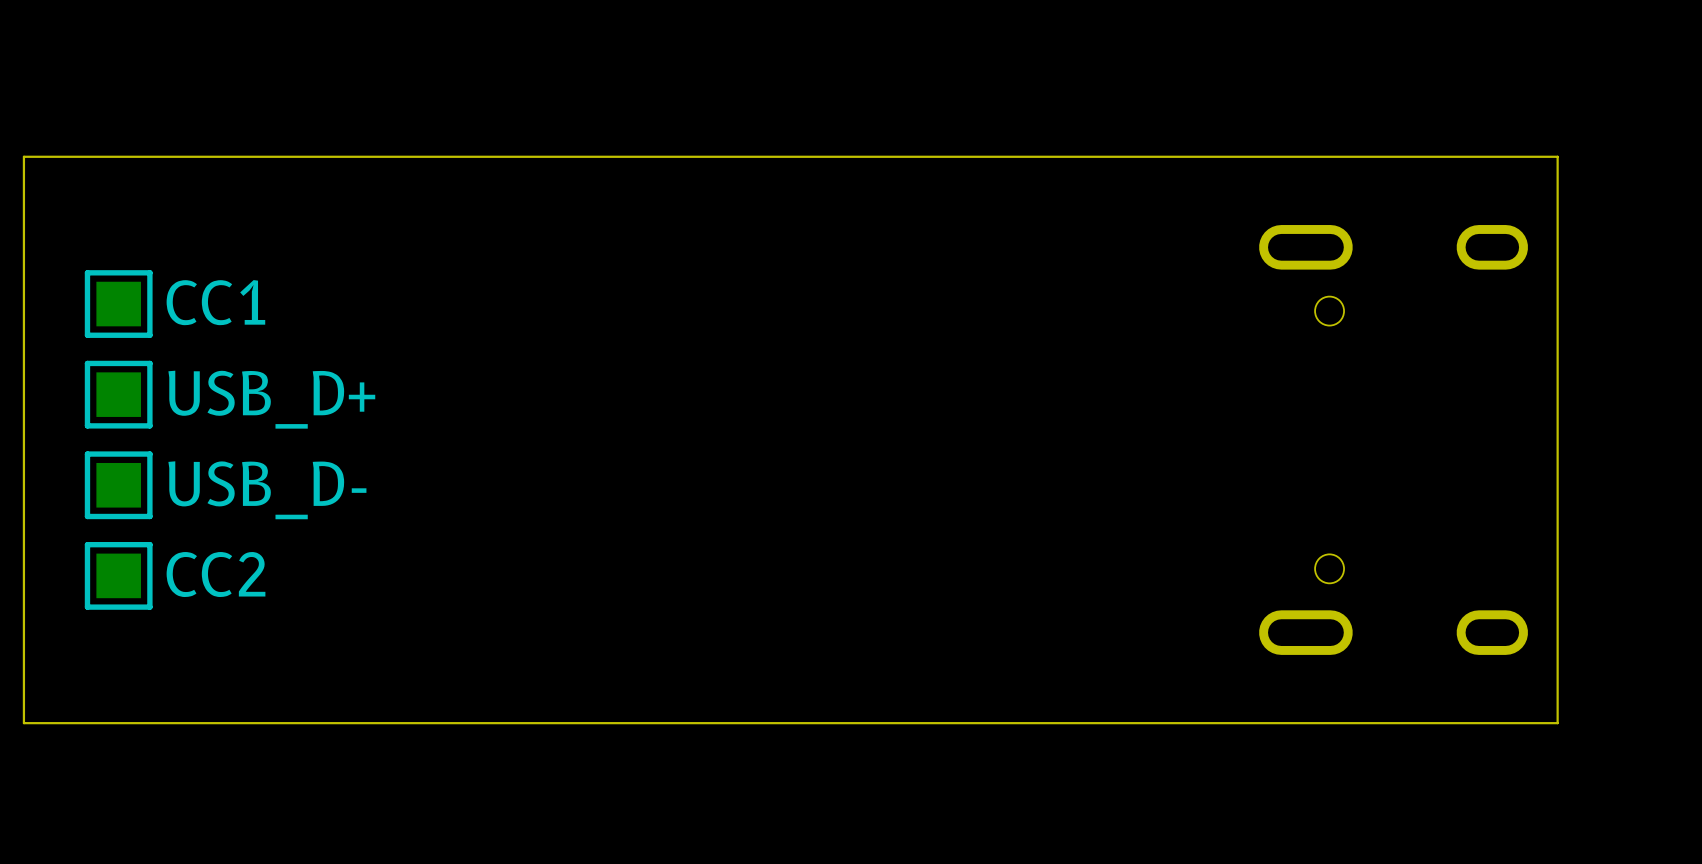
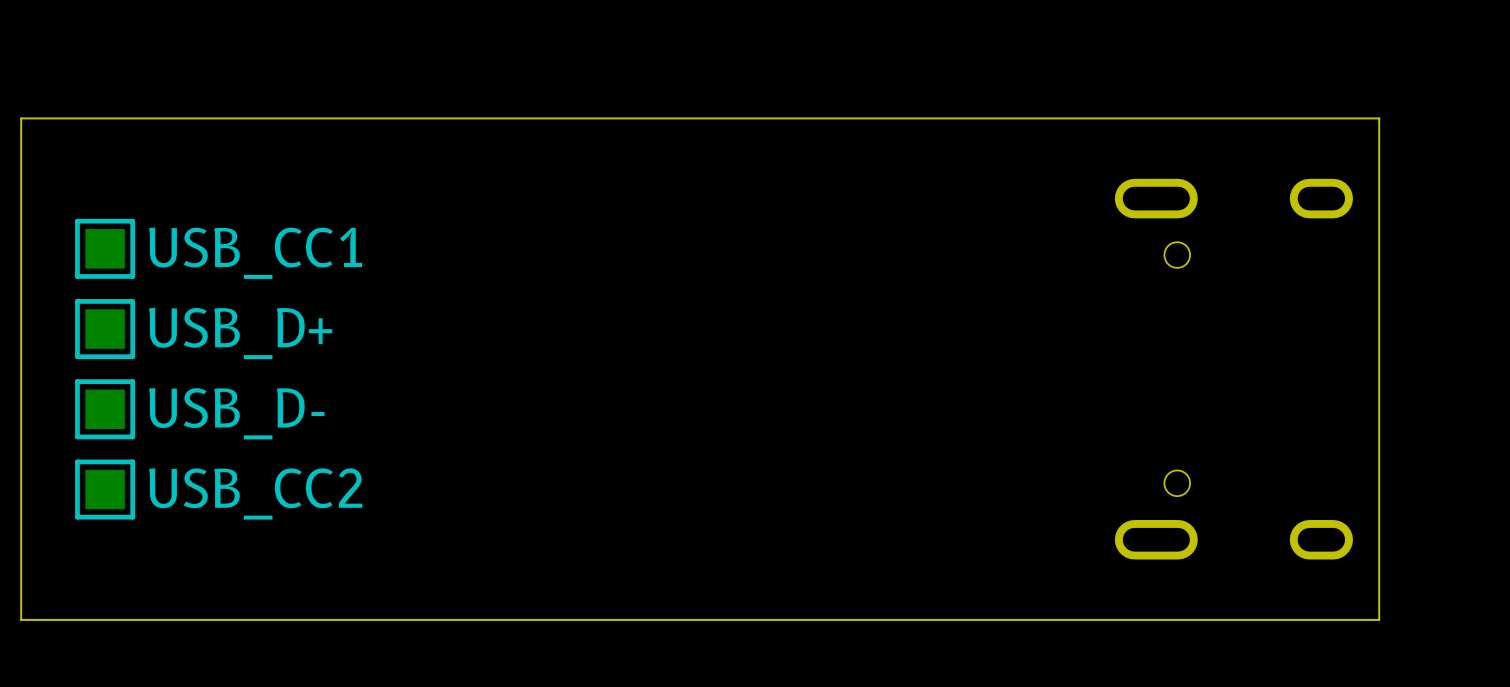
part value: CC1 (215, 302) -> USB_CC1 (255, 253)
part value: CC2 (216, 574) -> USB_CC2 (255, 493)

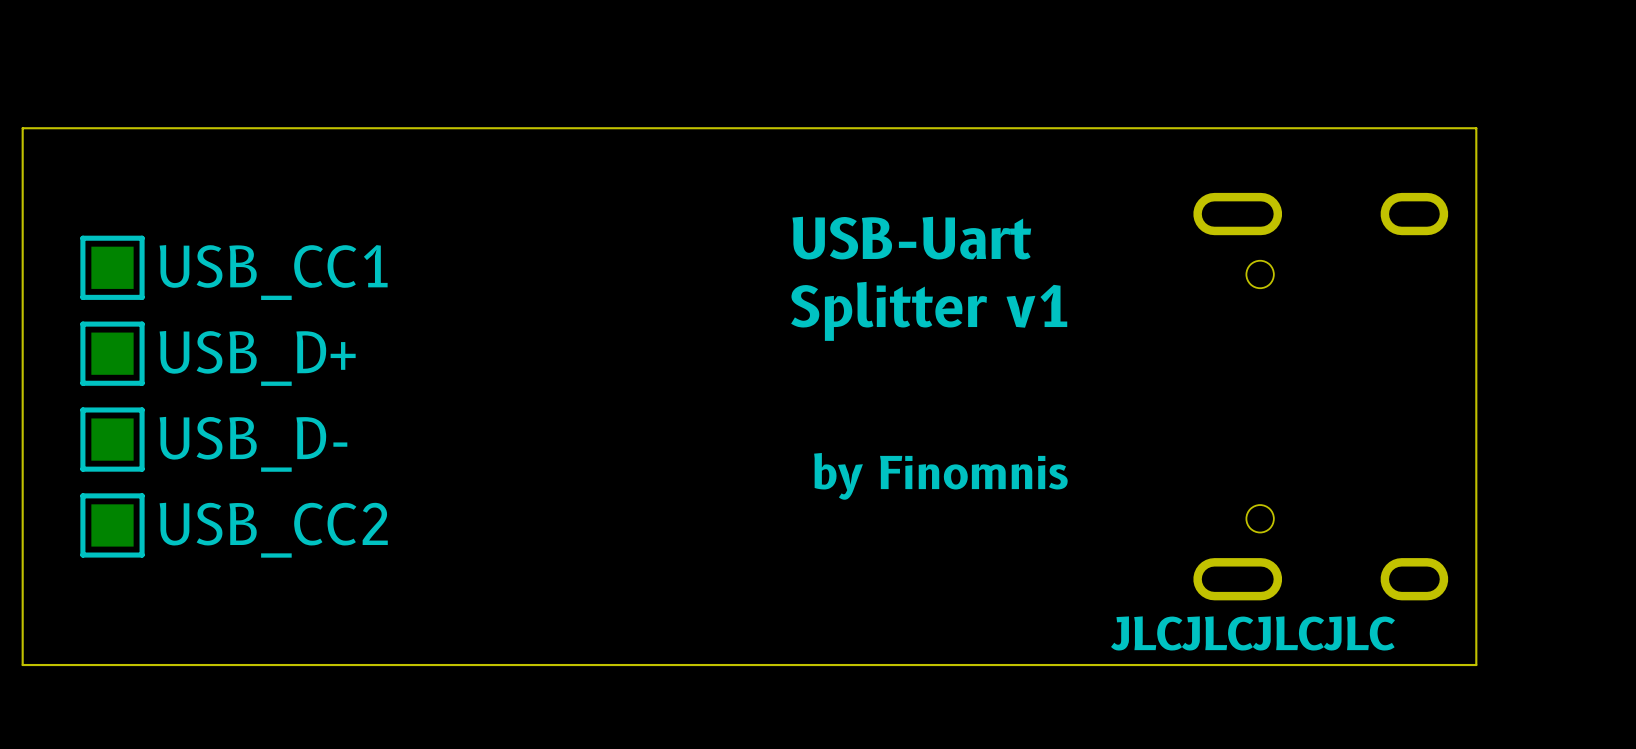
text: none -> USB-Uart (911, 238)
text: none -> Splitter v1 (929, 311)
text: none -> by Finomnis (940, 476)
text: none -> JLCJLCJLCJLC (1253, 633)

